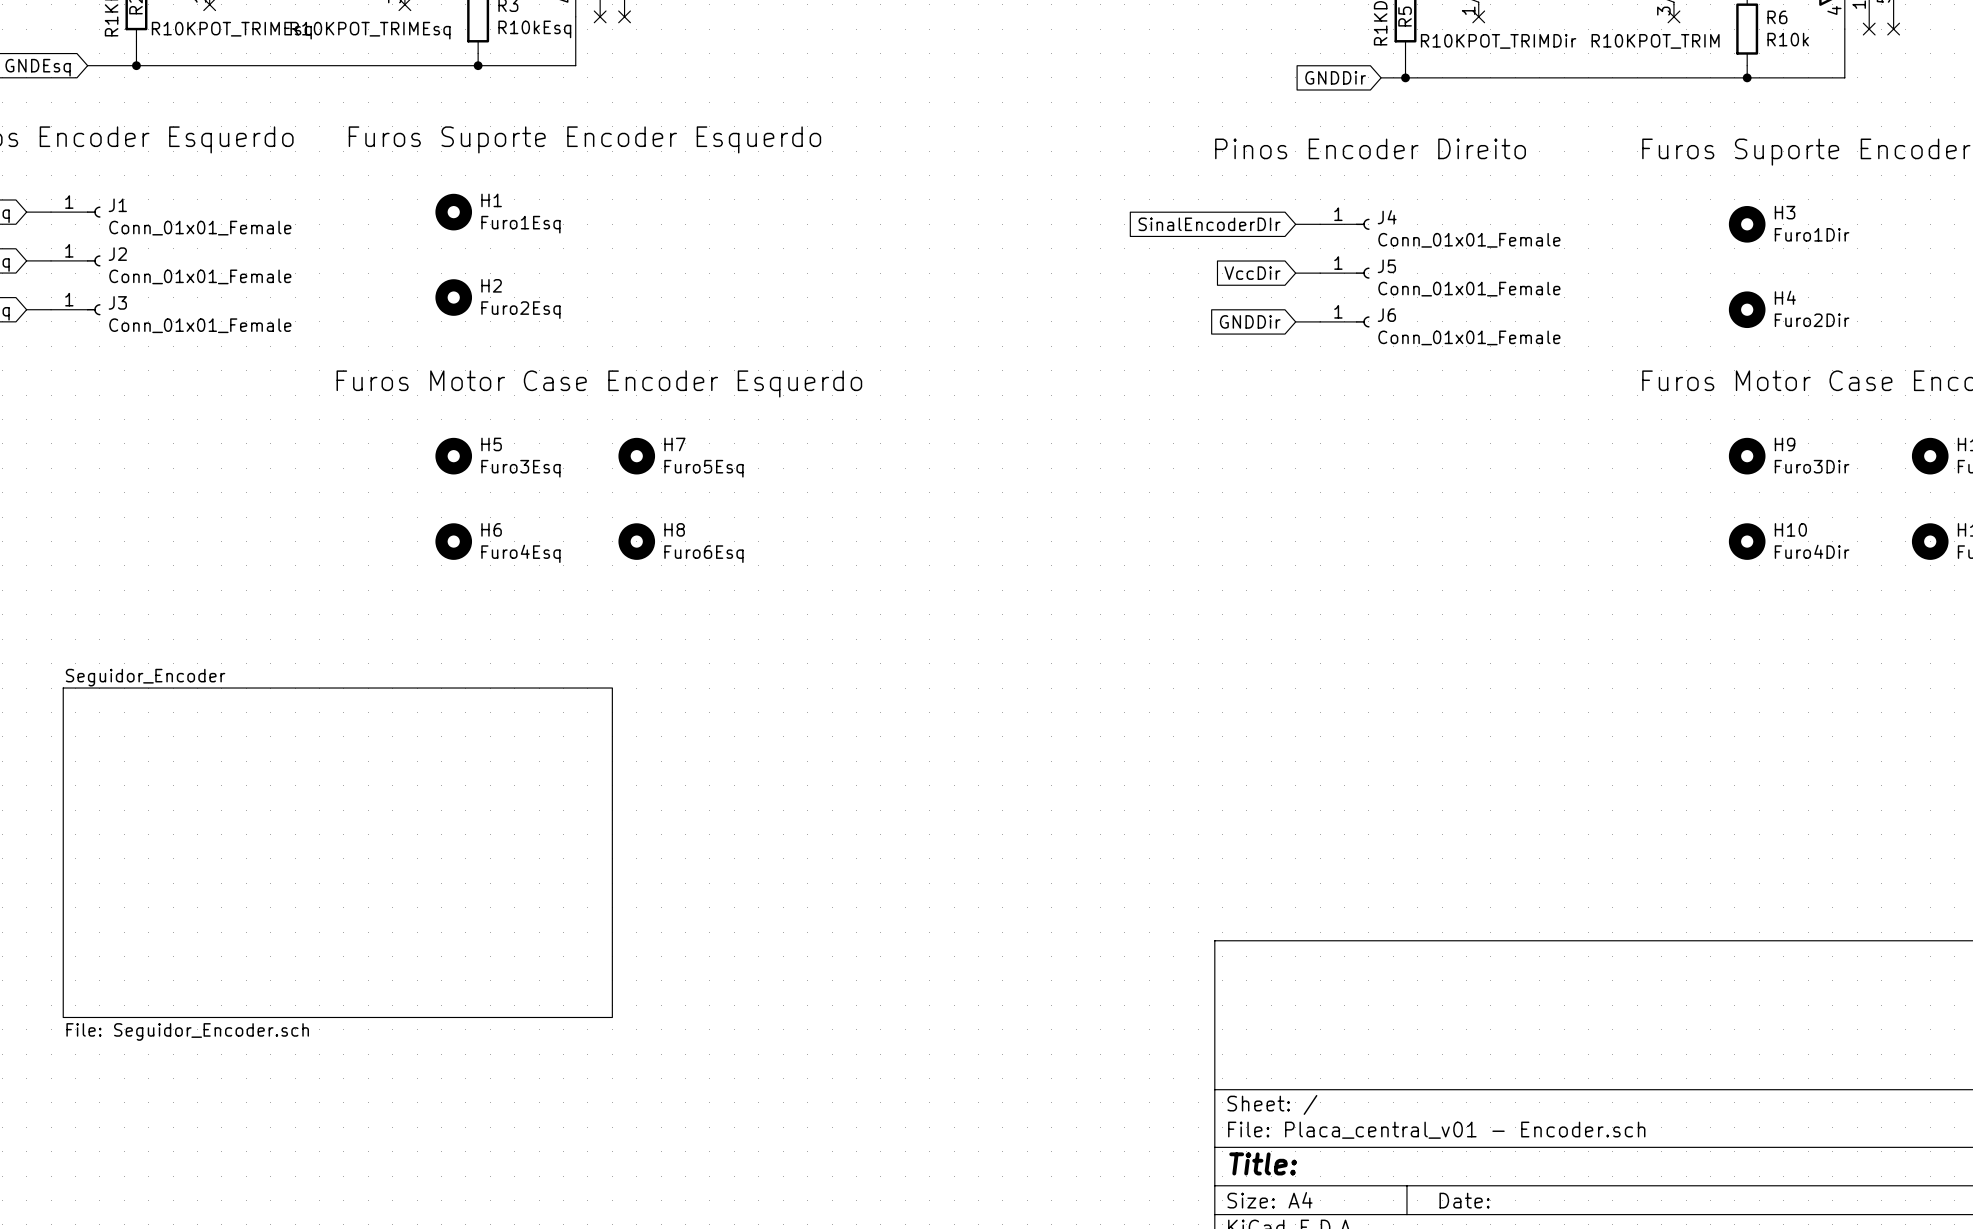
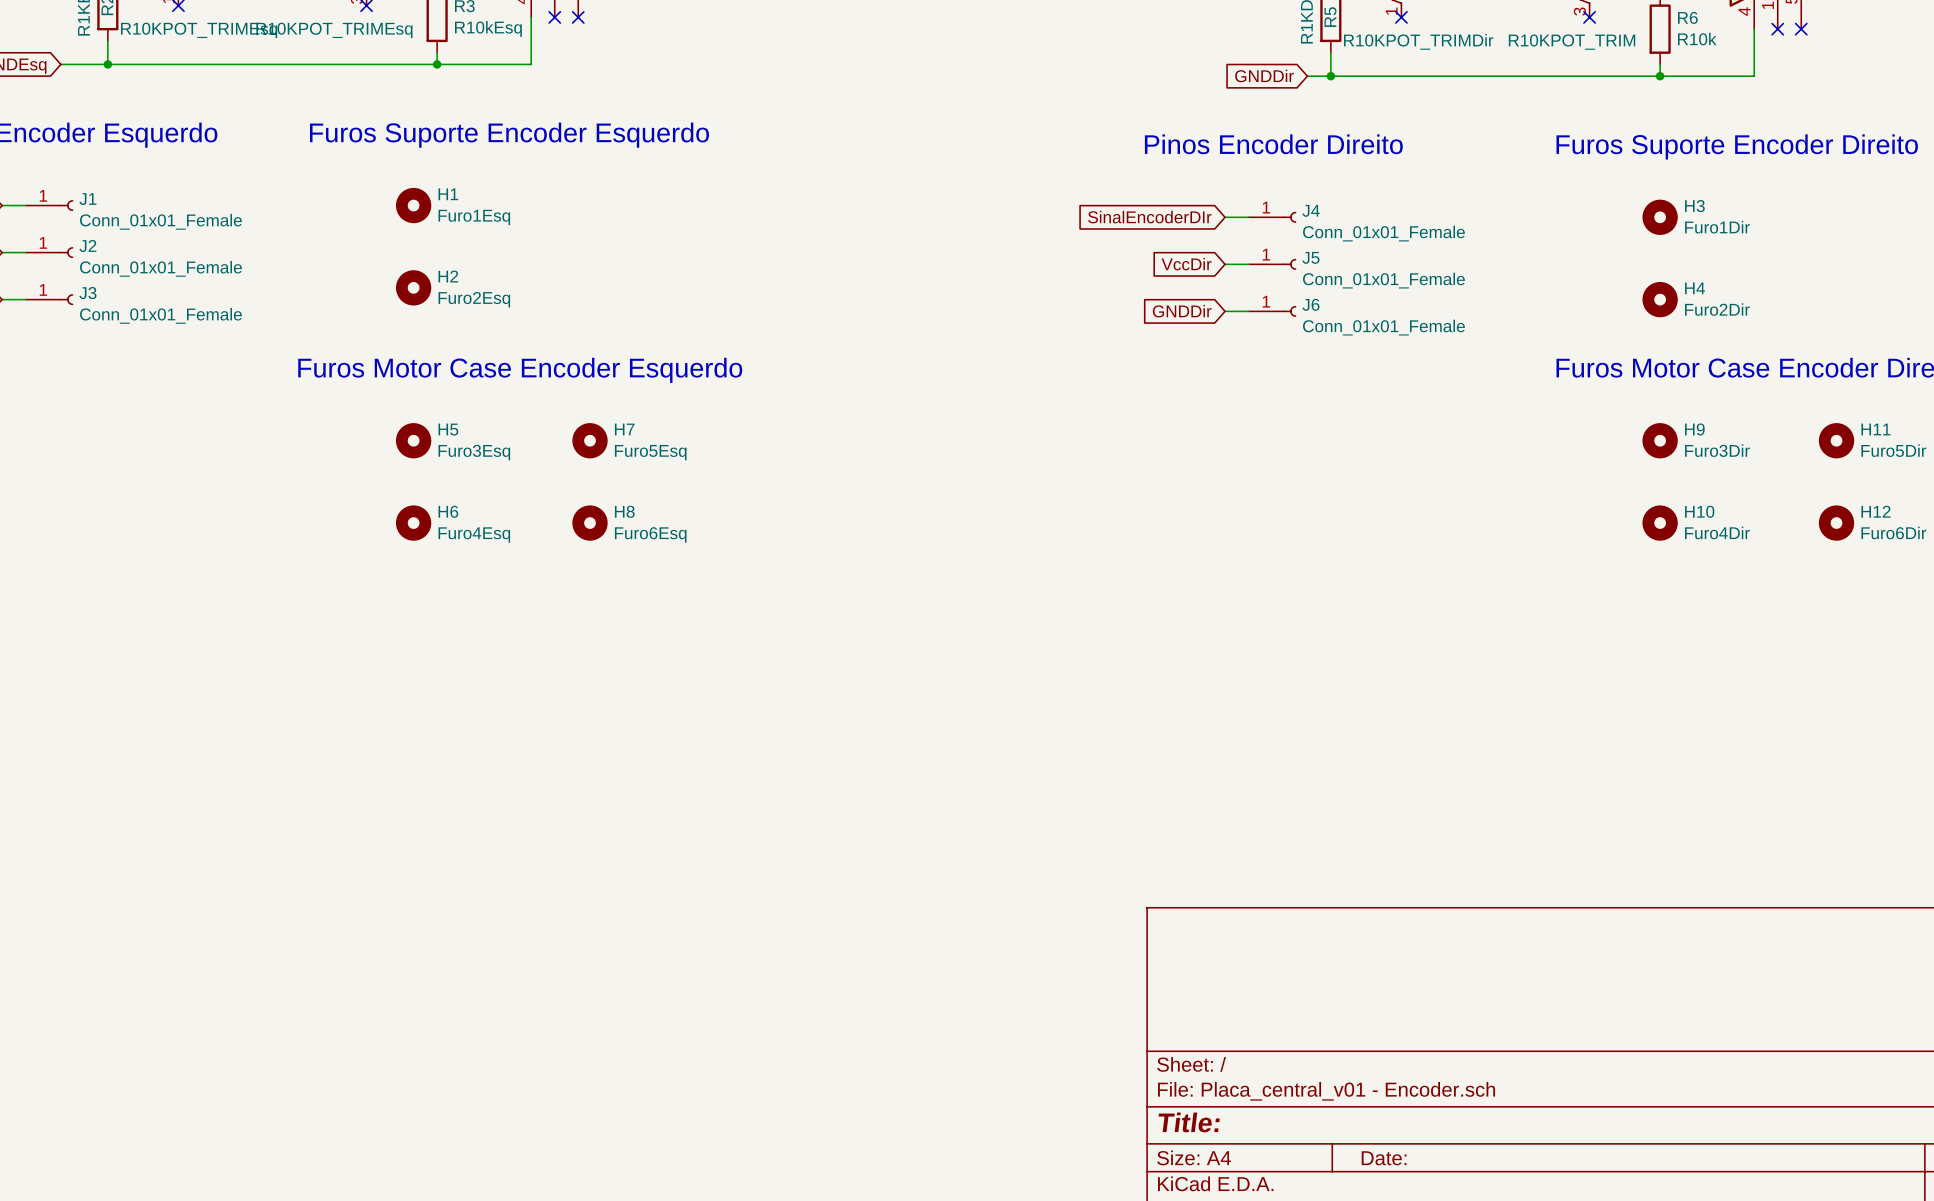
sheet Seguidor_Encoder: File: Seguidor_Encoder.sch (337, 852) -> none

